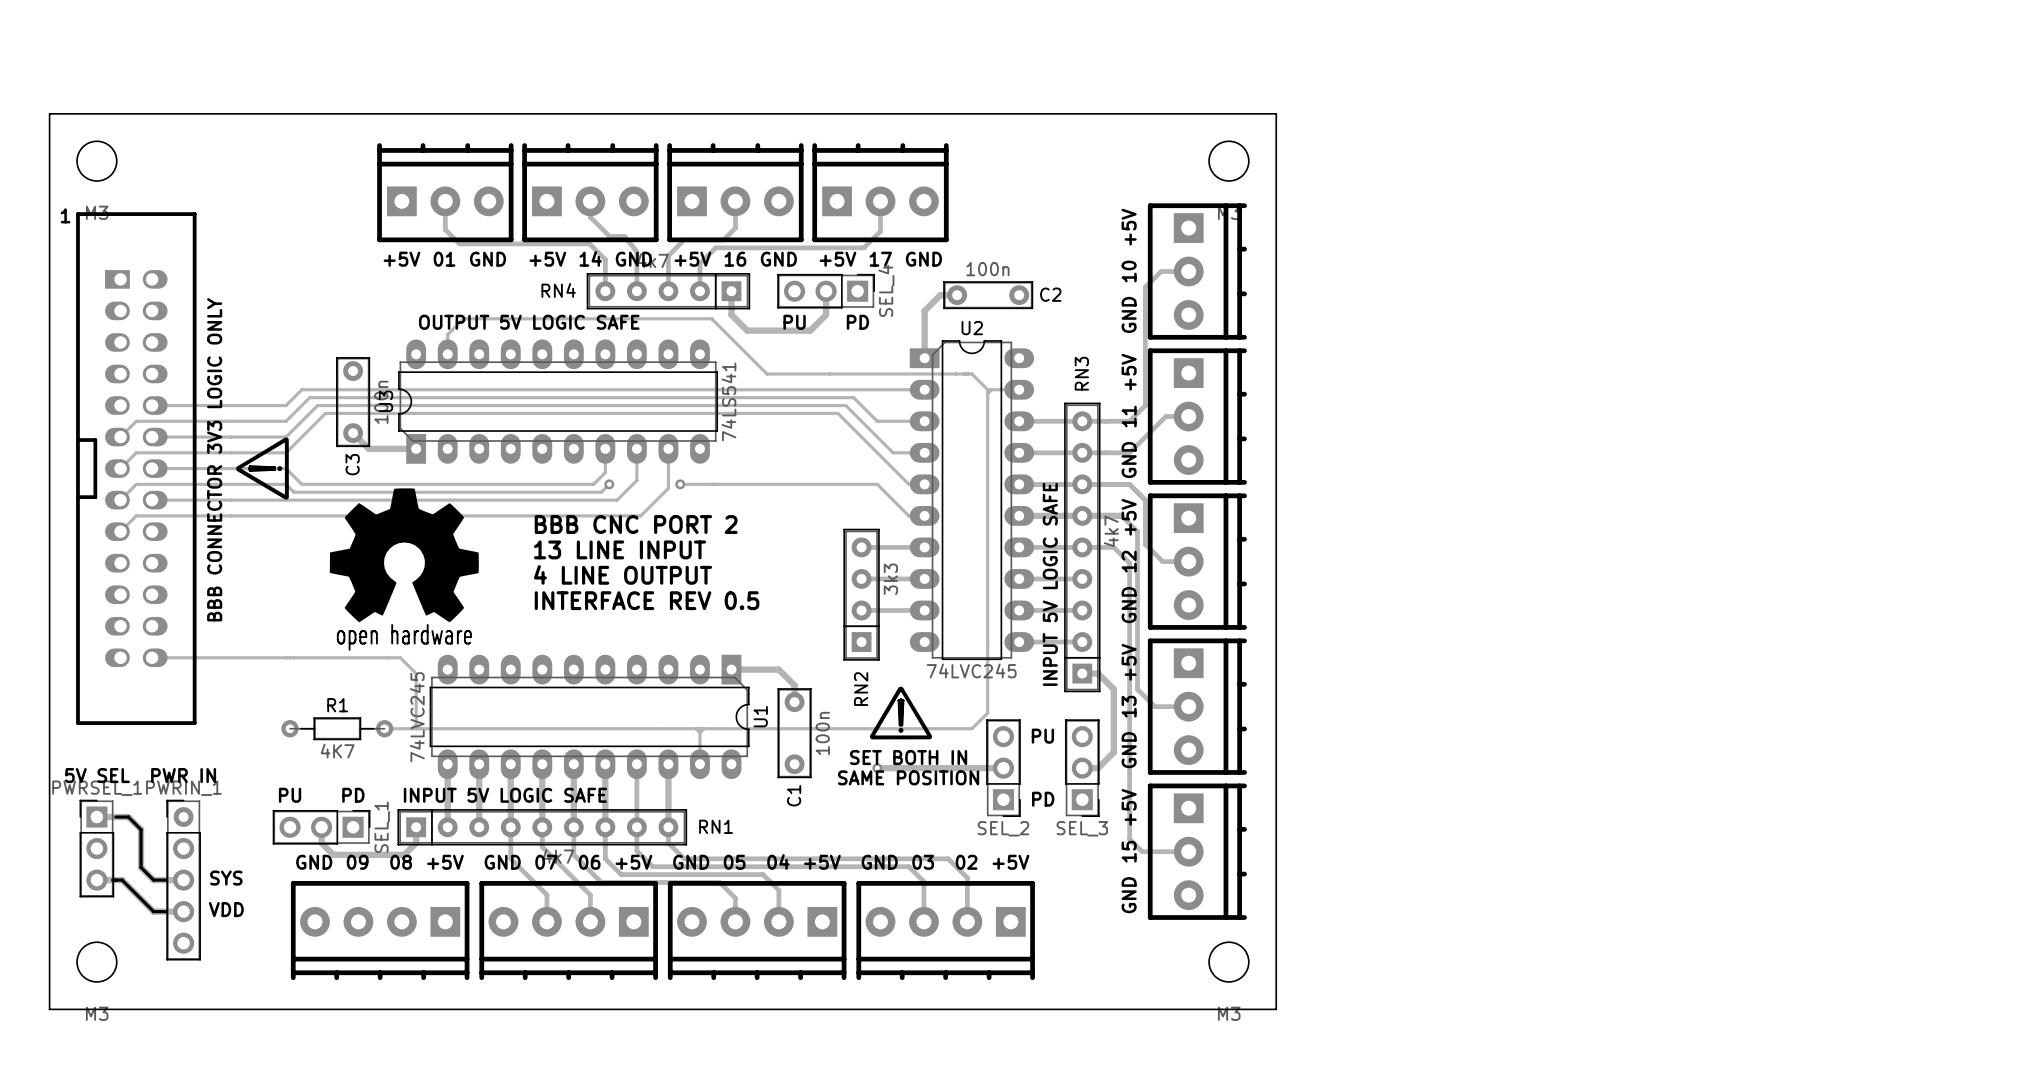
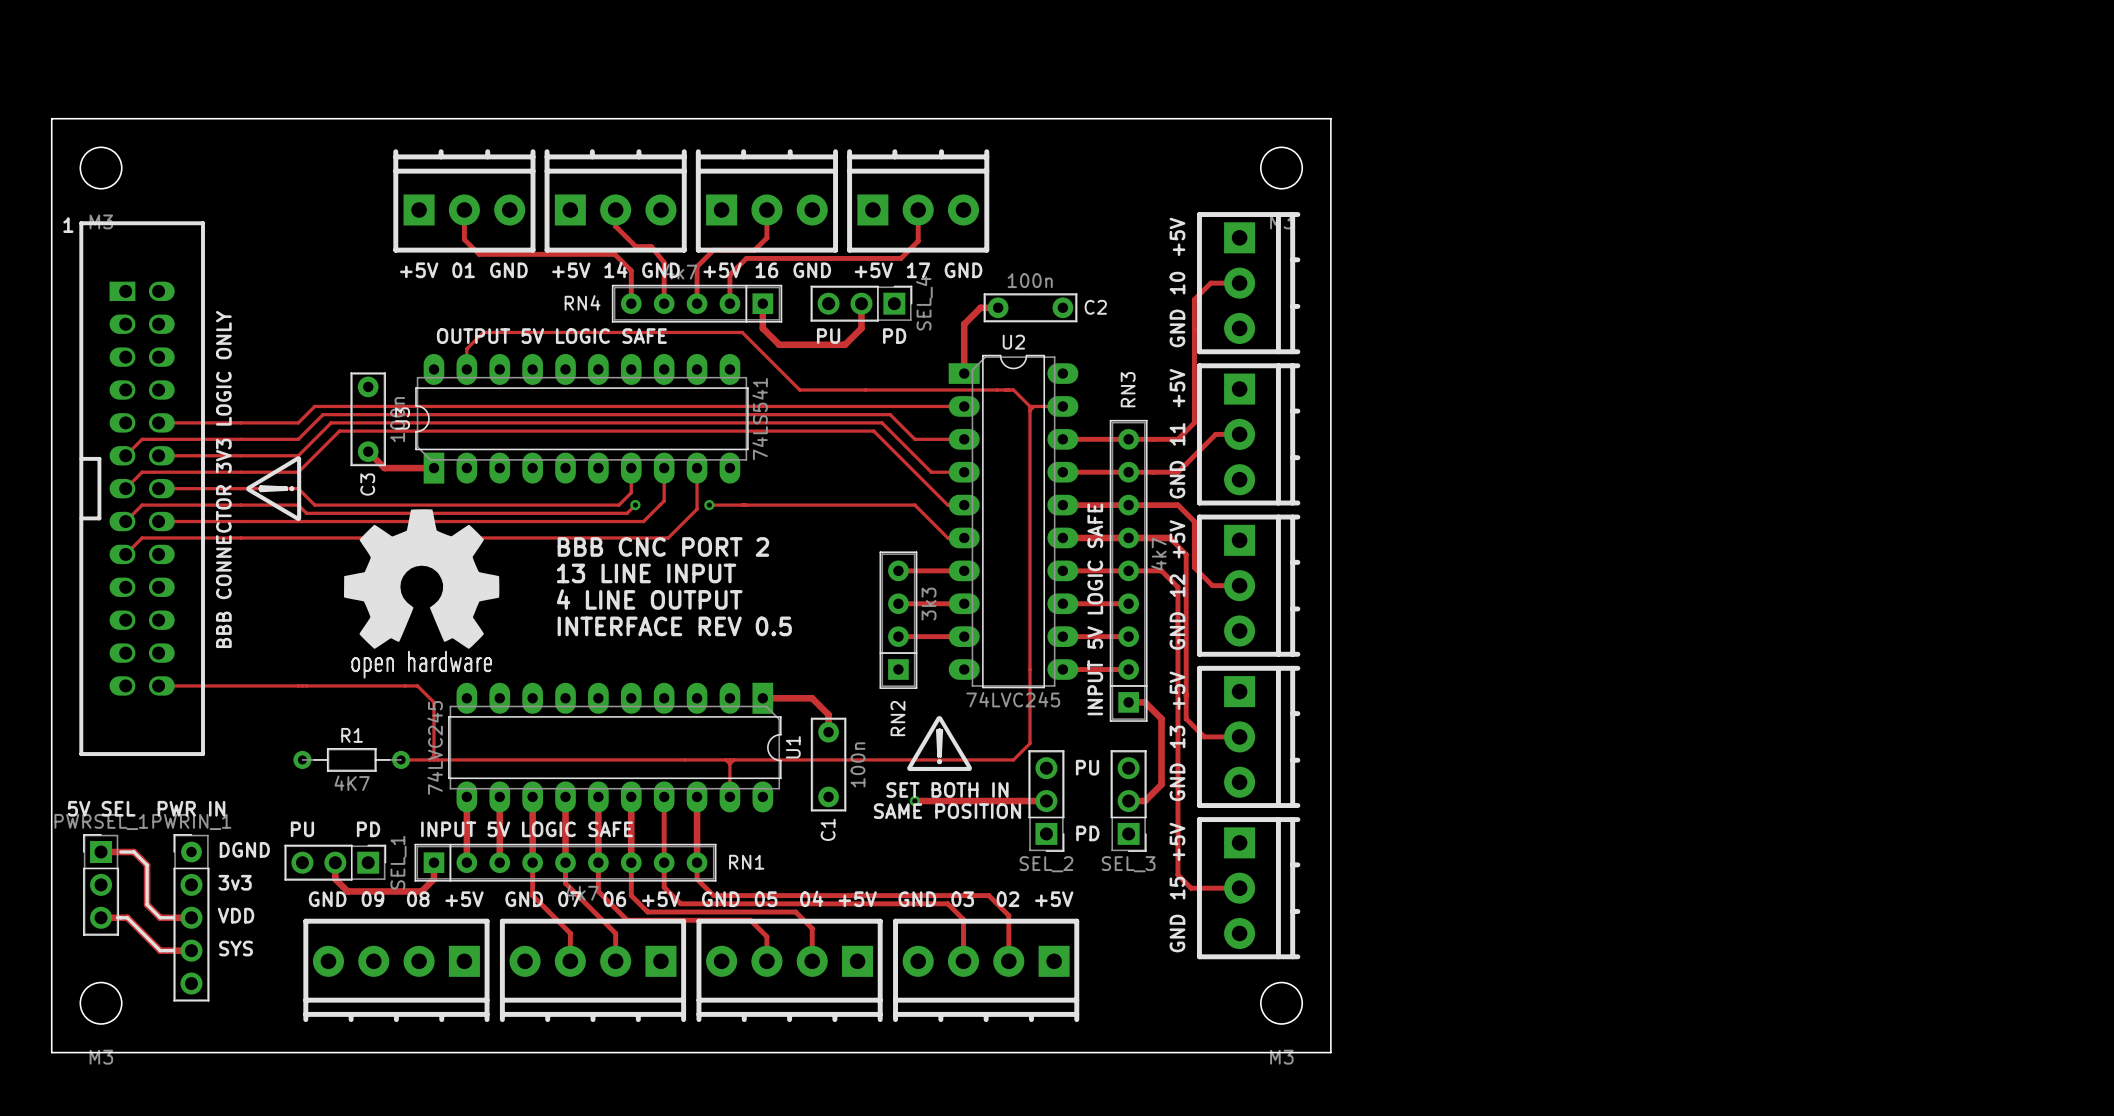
text: none -> DGND (244, 849)
text: none -> 3v3 (235, 882)
text: SYS (226, 878) -> VDD (236, 915)
text: VDD (226, 909) -> SYS (236, 948)

